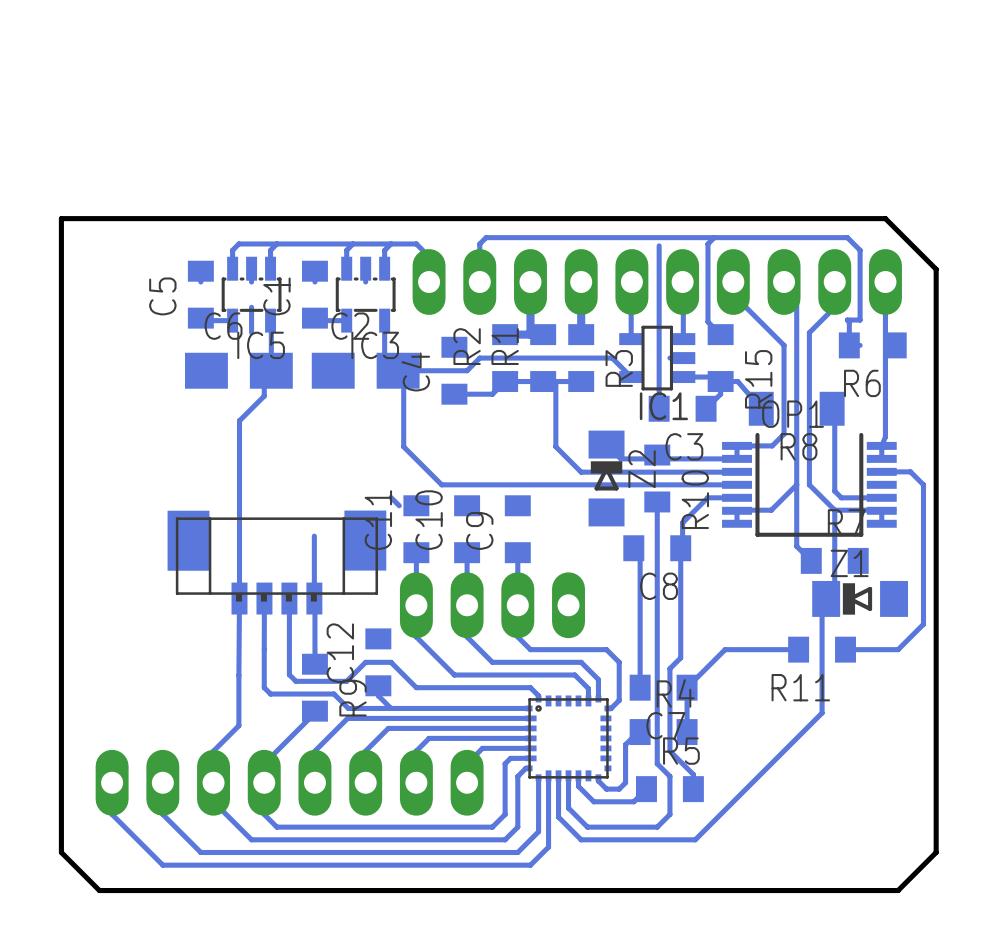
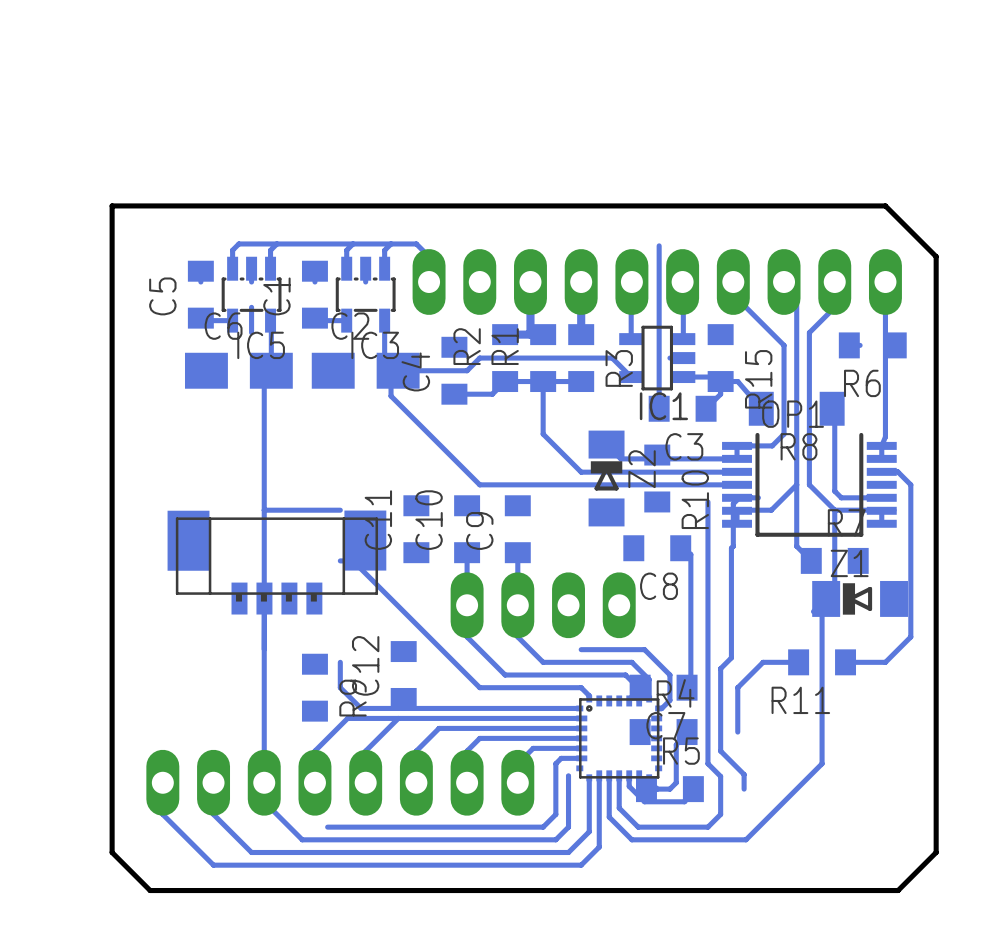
track: (714, 237) (707, 243) (707, 321) (720, 334) -> none
board edge: (936, 269) (885, 218) (61, 218) (61, 852) (99, 890) (150, 890) -> (936, 269) (936, 256) (885, 205) (112, 205) (112, 852) (150, 890)
track: (479, 282) (479, 243) (486, 237) (847, 237) (860, 250) (860, 320) (847, 320) (849, 321) (849, 345) -> none
track: (403, 376) (403, 446) (441, 484) (479, 484) -> (398, 370) (391, 377) (391, 396) (479, 484)
track: (555, 381) (555, 446) -> (543, 381) (543, 434) (555, 446)
track: (264, 396) (239, 420) (238, 725) (213, 751) (213, 782) -> (264, 396) (264, 649)
track: (897, 471) (910, 471) (923, 484) (923, 624) (910, 636) -> (897, 471) (910, 484) (910, 636)
track: (391, 497) (399, 505) -> none
track: (737, 497) (707, 497) (682, 522) (682, 546) (680, 548) (680, 657) (669, 668) (669, 675) -> none
track: none -> (758, 497) (739, 497) (733, 503) (731, 657) (720, 668) (720, 751) (744, 774) (744, 789)
track: (657, 501) (657, 763) (669, 776) (669, 814) (657, 827) -> none
track: none -> (707, 501) (707, 763) (720, 776) (720, 814)
track: none -> (340, 510) (264, 510)
track: (314, 536) (314, 664) -> none
track: (633, 548) (640, 554) (640, 687) -> (684, 548) (690, 554) (690, 687)
track: (416, 552) (416, 636) (454, 675) (505, 675) -> none
track: (289, 598) (289, 674) (295, 681) (346, 681) (365, 662) (391, 662) (416, 687) (479, 687) -> (340, 560) (353, 560) (479, 687)
part position: (492, 605) -> (543, 605)
track: (581, 649) (530, 649) -> (543, 662) (530, 649)
track: (606, 649) (619, 662) (619, 700) (611, 708) (607, 708) -> (606, 649) (644, 649) (669, 675)
track: (798, 649) (725, 649) (687, 687) (687, 732) -> none
R11 position: (822, 649) -> (822, 662)
track: (898, 649) (845, 649) -> (898, 649) (885, 662) (845, 662)
C12 position: (378, 662) -> (403, 675)
track: (543, 662) (492, 662) -> (505, 675) (492, 662)
track: (581, 662) (598, 679) (598, 698) -> (581, 662) (631, 662) (649, 679) (649, 698)
track: none -> (798, 662) (763, 662) (737, 687) (737, 732)
track: (574, 675) (588, 688) (588, 700) -> (574, 675) (625, 675) (639, 688) (639, 700)
track: (378, 685) (378, 695) (391, 708) -> none
track: (264, 687) (270, 694) (333, 694) (348, 708) (361, 708) -> (340, 662) (340, 687) (361, 708)
track: (530, 687) (538, 695) (538, 698) -> (530, 687) (581, 687) (589, 695) (589, 698)
track: (669, 700) (669, 751) (693, 774) (693, 789) -> (669, 700) (661, 708) (658, 708)
track: none -> (579, 708) (529, 708)
track: (314, 711) (264, 763) -> (264, 687) (264, 763)
track: (822, 713) (720, 814) -> (822, 713) (822, 763) (746, 839) (695, 839)
track: none -> (581, 718) (531, 718)
track: (439, 728) (388, 728) -> (398, 718) (388, 728)
track: none -> (581, 728) (531, 728)
track: (640, 732) (625, 744) (625, 782) (619, 789) (606, 789) (598, 781) (598, 777) -> none
track: none -> (690, 732) (676, 744) (676, 782) (669, 789) (657, 789) (649, 781) (649, 777)
track: (479, 738) (429, 738) -> (439, 728) (429, 738)
part position: (568, 738) -> (619, 738)
track: none -> (581, 738) (531, 738)
track: (531, 748) (482, 748) (467, 763) -> (479, 738) (467, 751) (467, 763)
track: (531, 758) (510, 758) (505, 763) (505, 814) (492, 827) -> (581, 758) (561, 758) (555, 763) (555, 814) (543, 827) (492, 827)
track: (529, 768) (525, 768) (517, 776) -> (581, 748) (533, 748) (517, 763) (517, 776)
track: (548, 775) (548, 847) (530, 865) -> (599, 775) (599, 847) (581, 865) (530, 865)
track: (558, 775) (558, 817) (581, 839) (631, 839) -> (609, 775) (609, 817) (631, 839)
track: (578, 775) (578, 786) (593, 801) (633, 801) (646, 789) -> (629, 775) (629, 786) (644, 801) (684, 801) (697, 789)
track: (538, 777) (538, 831) (517, 852) -> (589, 777) (589, 831) (568, 852) (517, 852)
track: (112, 782) (112, 814) (162, 865) (213, 865) -> none
part position: (289, 782) -> (340, 782)
track: (517, 782) (517, 827) (505, 839) -> (568, 808) (568, 827) (555, 839) (505, 839)
track: (213, 801) (251, 839) (302, 839) -> (213, 801) (213, 814) (251, 852)
track: (264, 801) (264, 814) (276, 827) (327, 827) -> (264, 801) (302, 839)
track: (568, 808) (587, 827) (638, 827) -> (619, 775) (619, 808) (638, 827)
track: (707, 827) (695, 839) -> (707, 827) (657, 827)
track: (251, 852) (200, 852) -> (213, 865) (200, 852)

